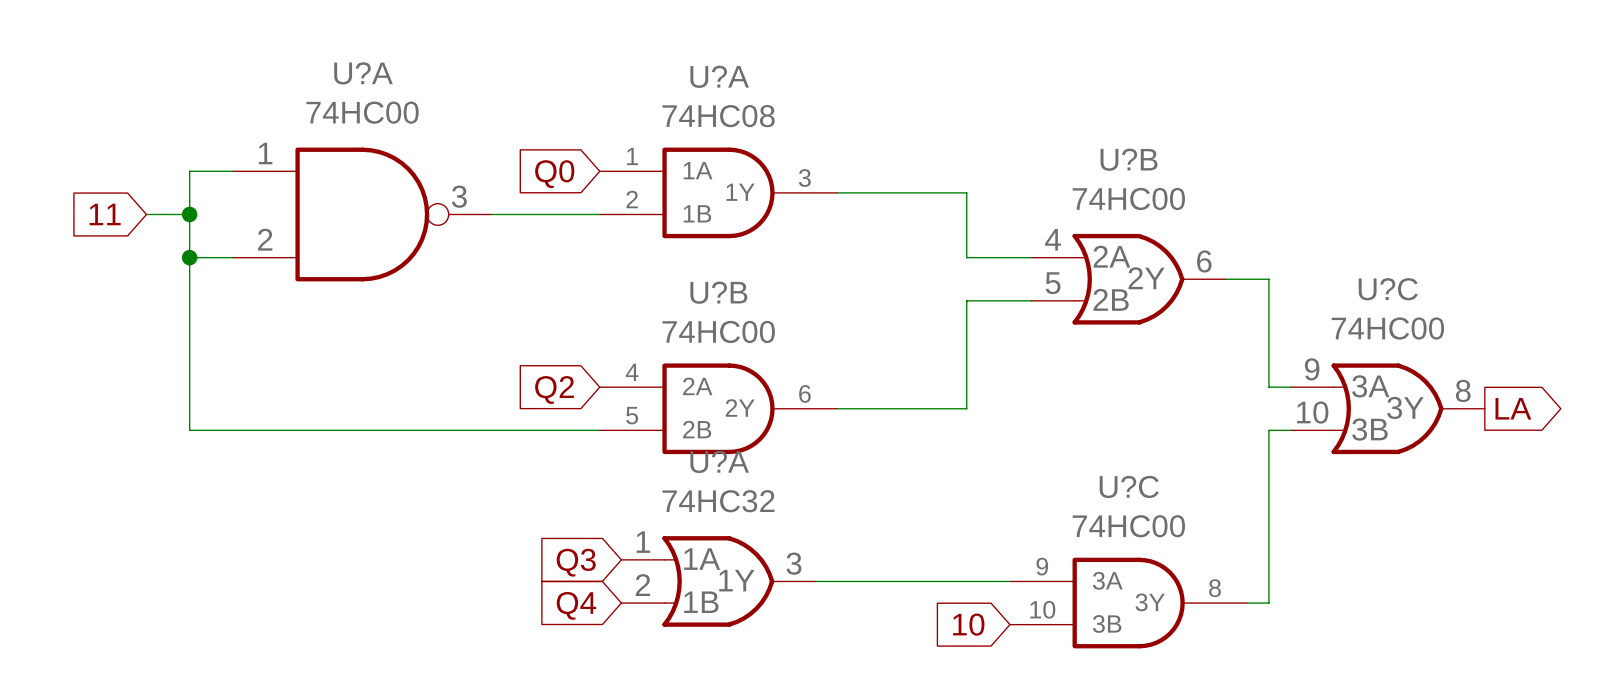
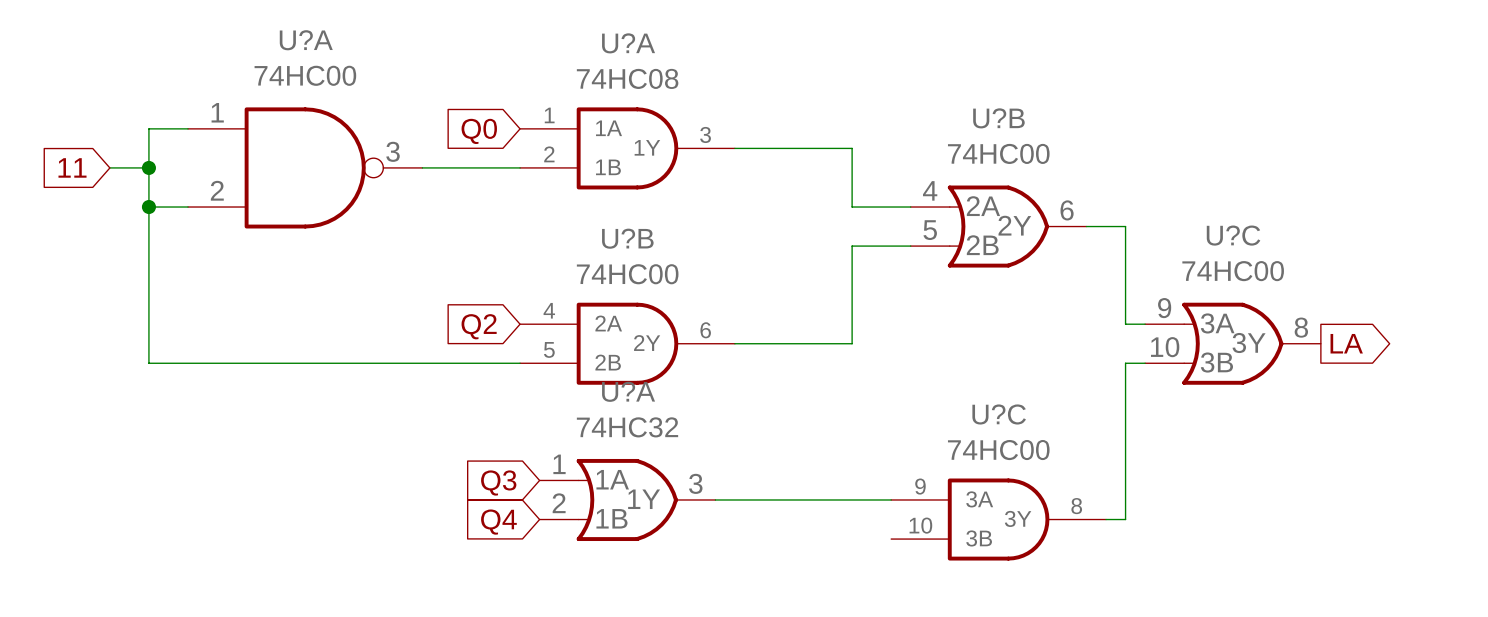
global label: 10 (968, 624) -> none

